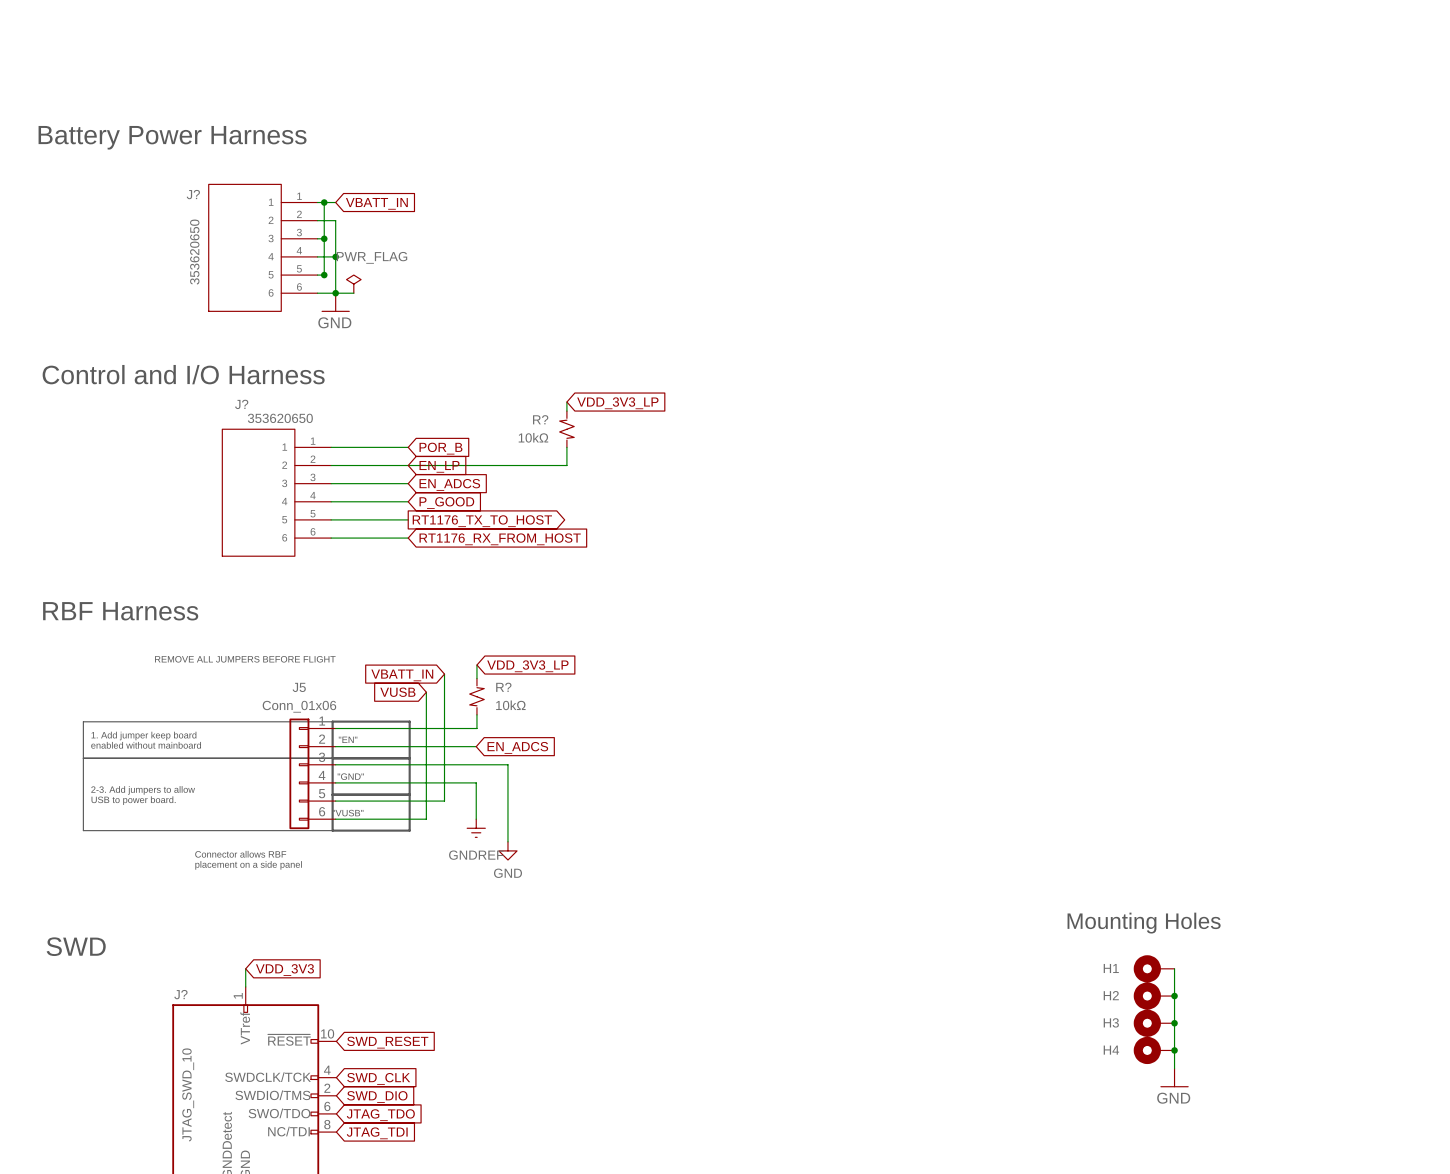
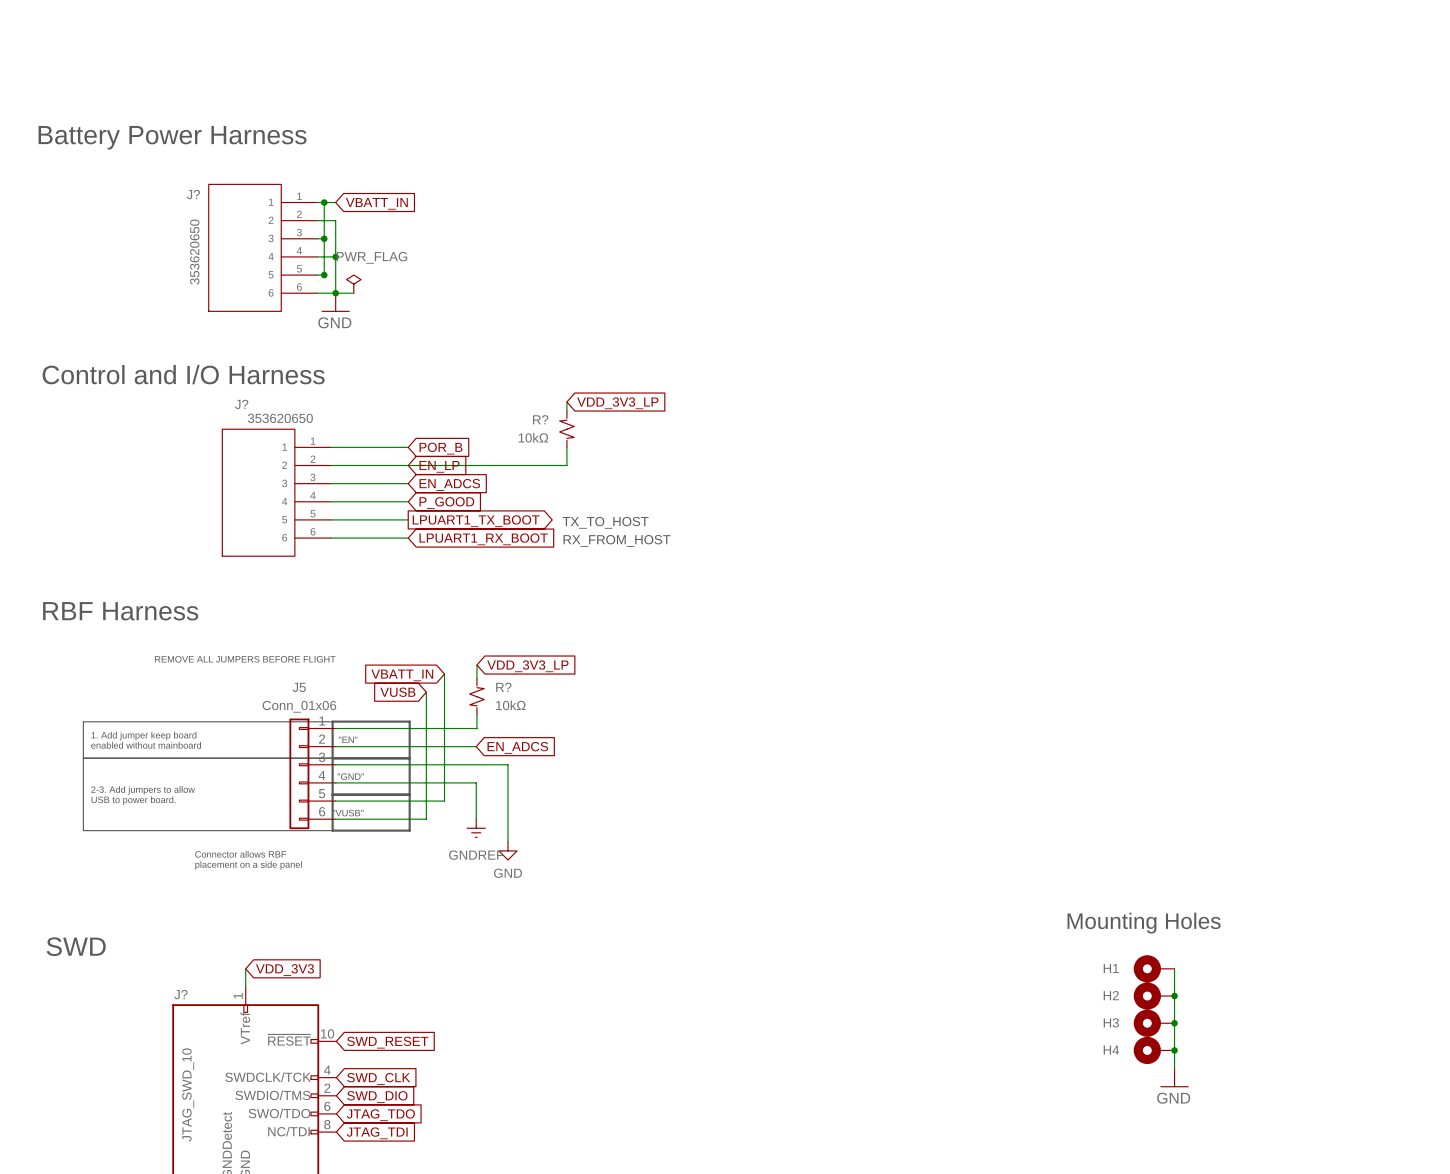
global label: RT1176_TX_TO_HOST (482, 521) -> LPUART1_TX_BOOT (476, 521)
text: none -> TX_TO_HOST (605, 522)
global label: RT1176_RX_FROM_HOST (500, 539) -> LPUART1_RX_BOOT (483, 539)
text: none -> RX_FROM_HOST (616, 540)

